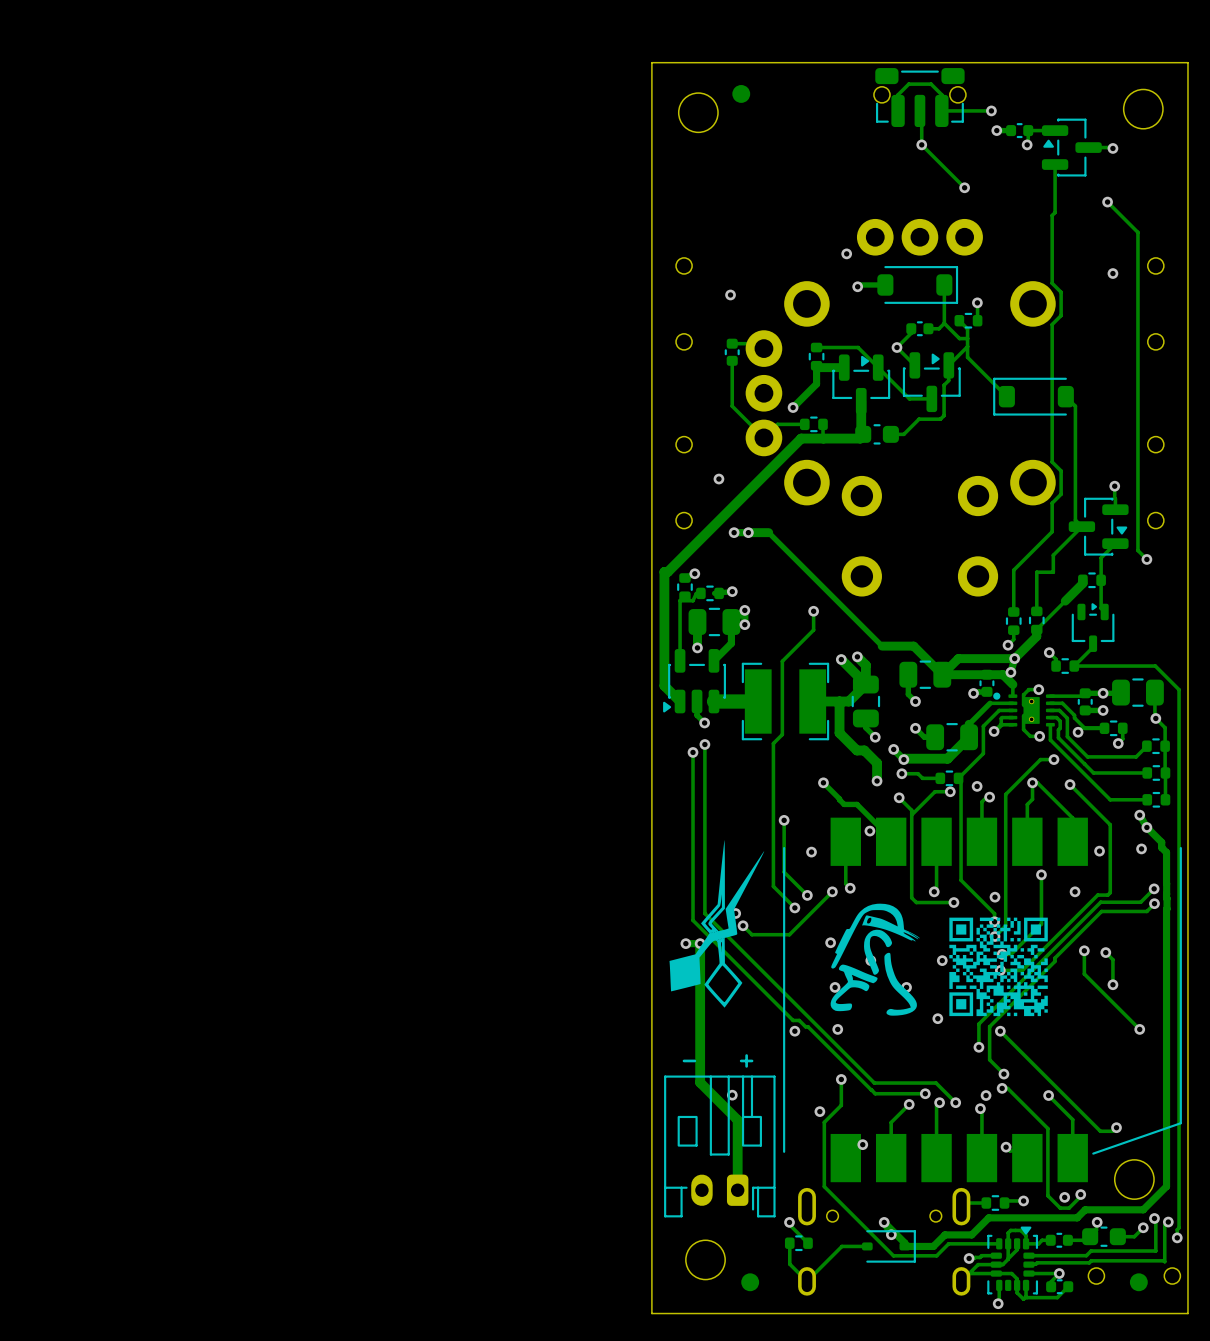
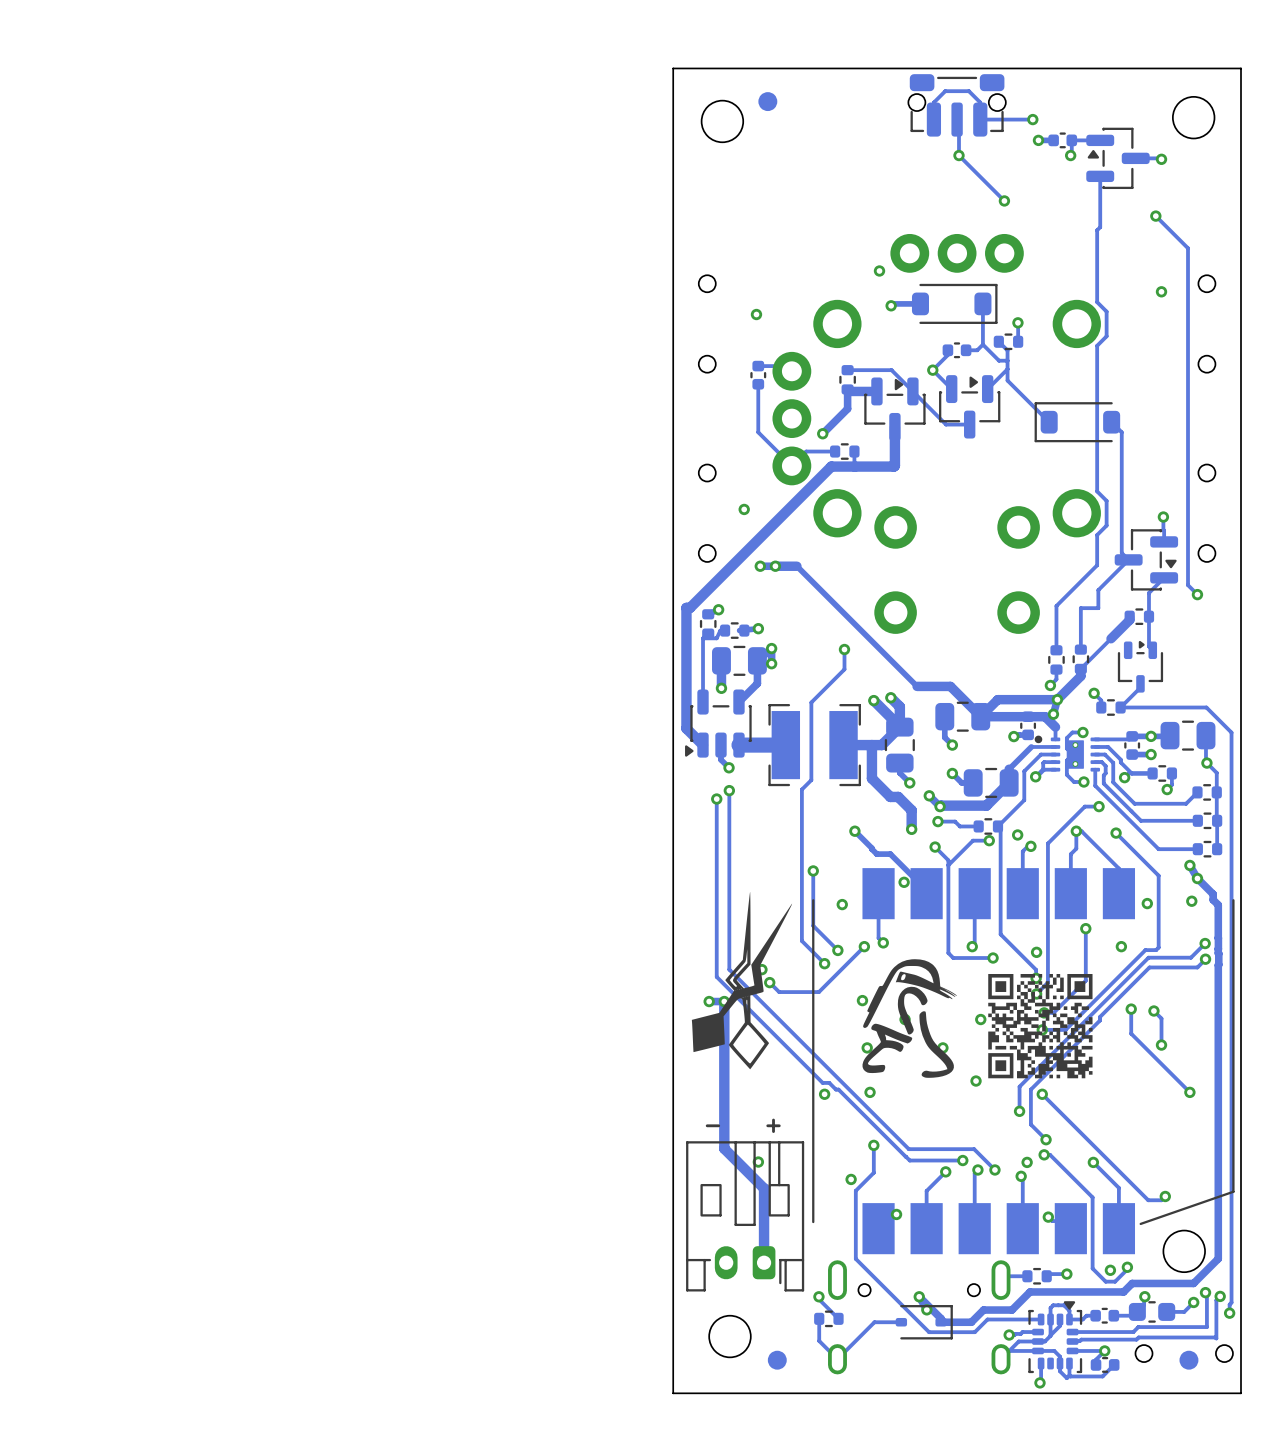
track: (948, 365) (948, 380) (944, 385) (944, 415) (940, 419) (919, 419) (903, 434) (890, 434) -> none
part: (877, 434) -> none

